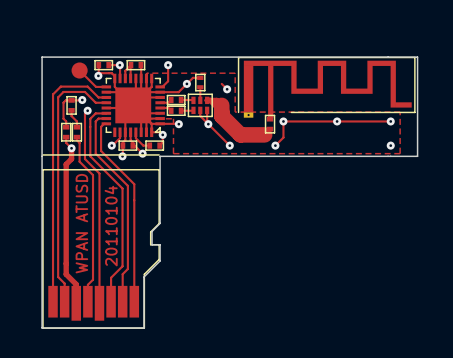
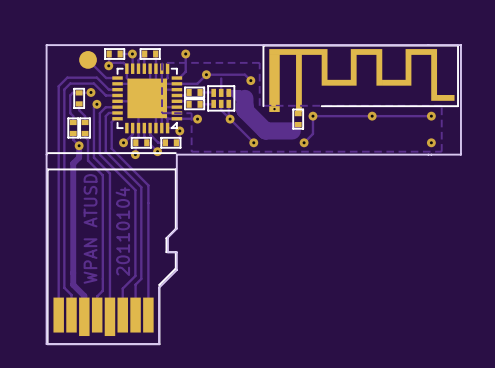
track: (200, 77) (192, 77) (186, 83) -> (244, 74) (206, 74)
part: (200, 82) -> none

